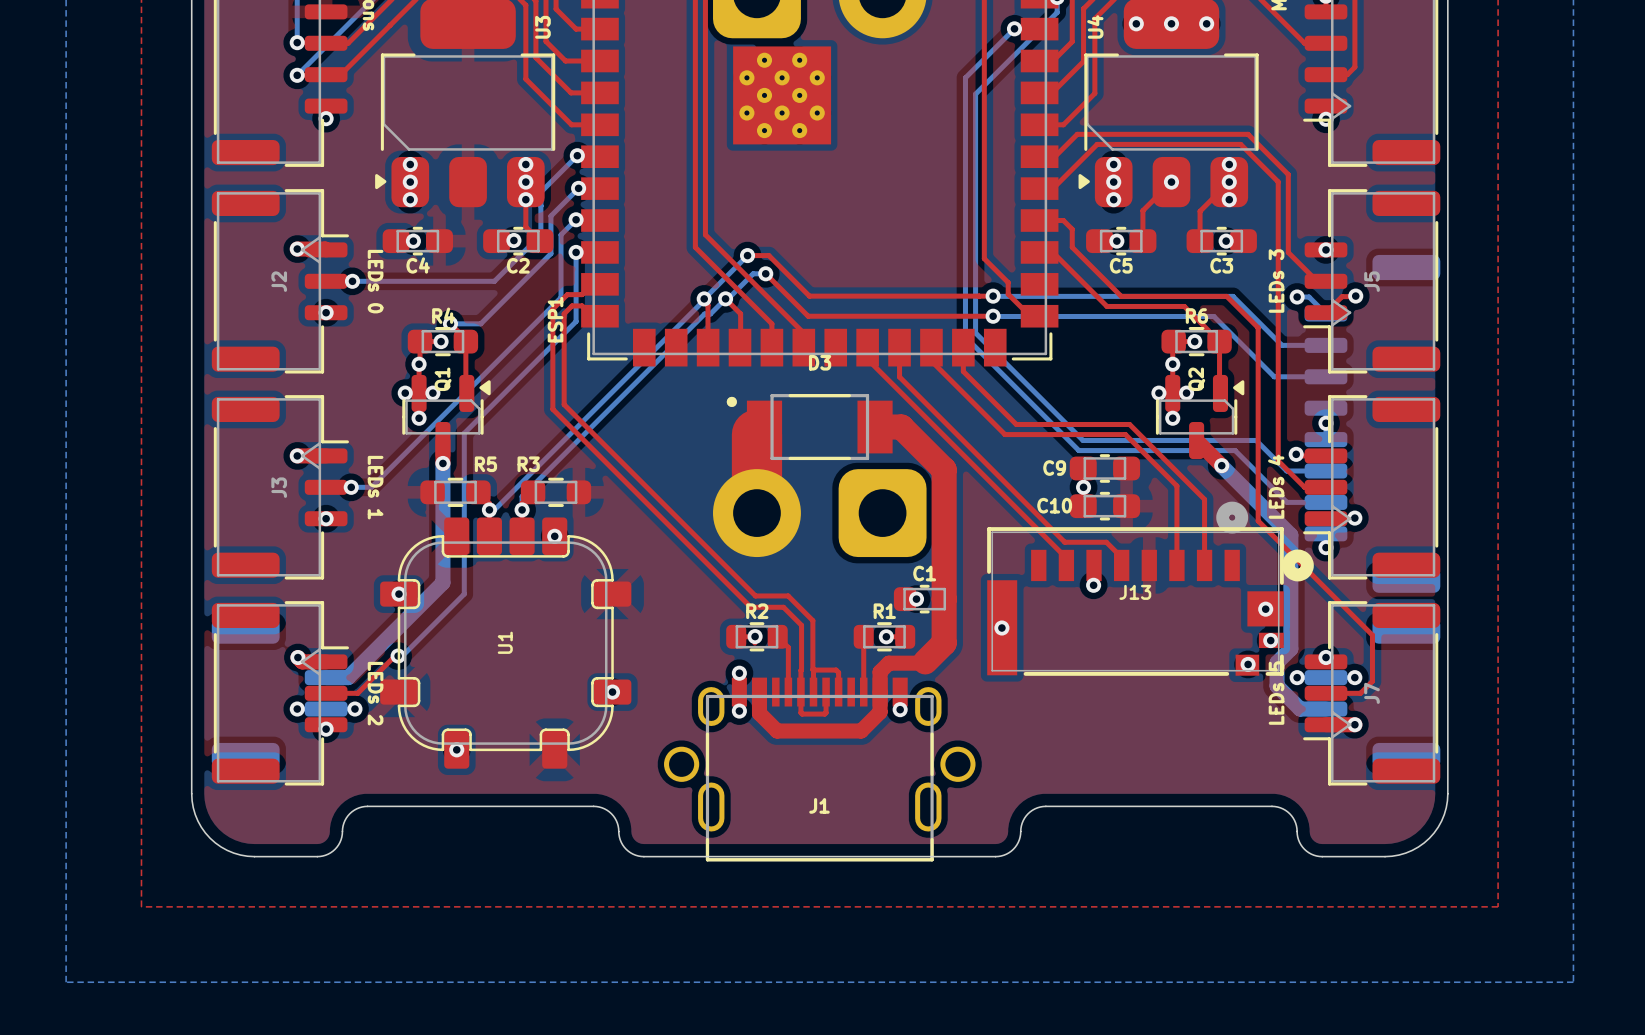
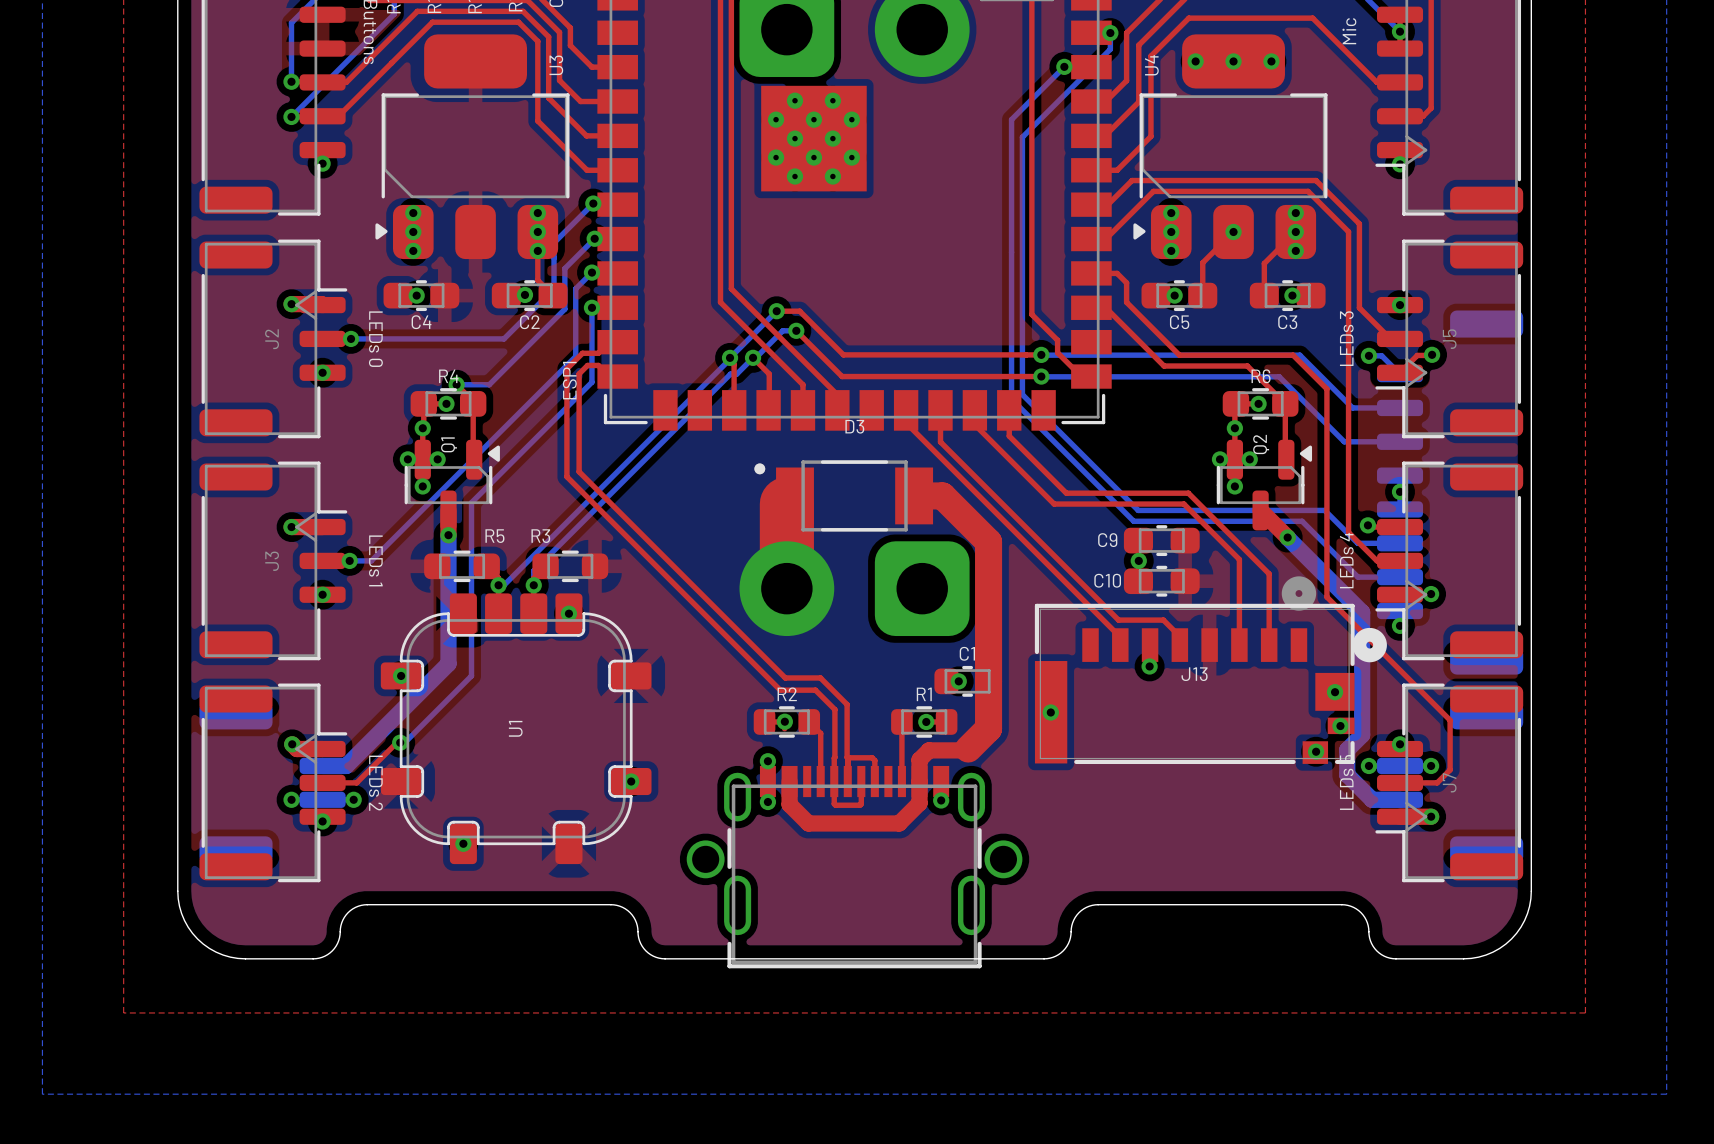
J1: (819, 769) -> none
part: none -> (854, 867)

